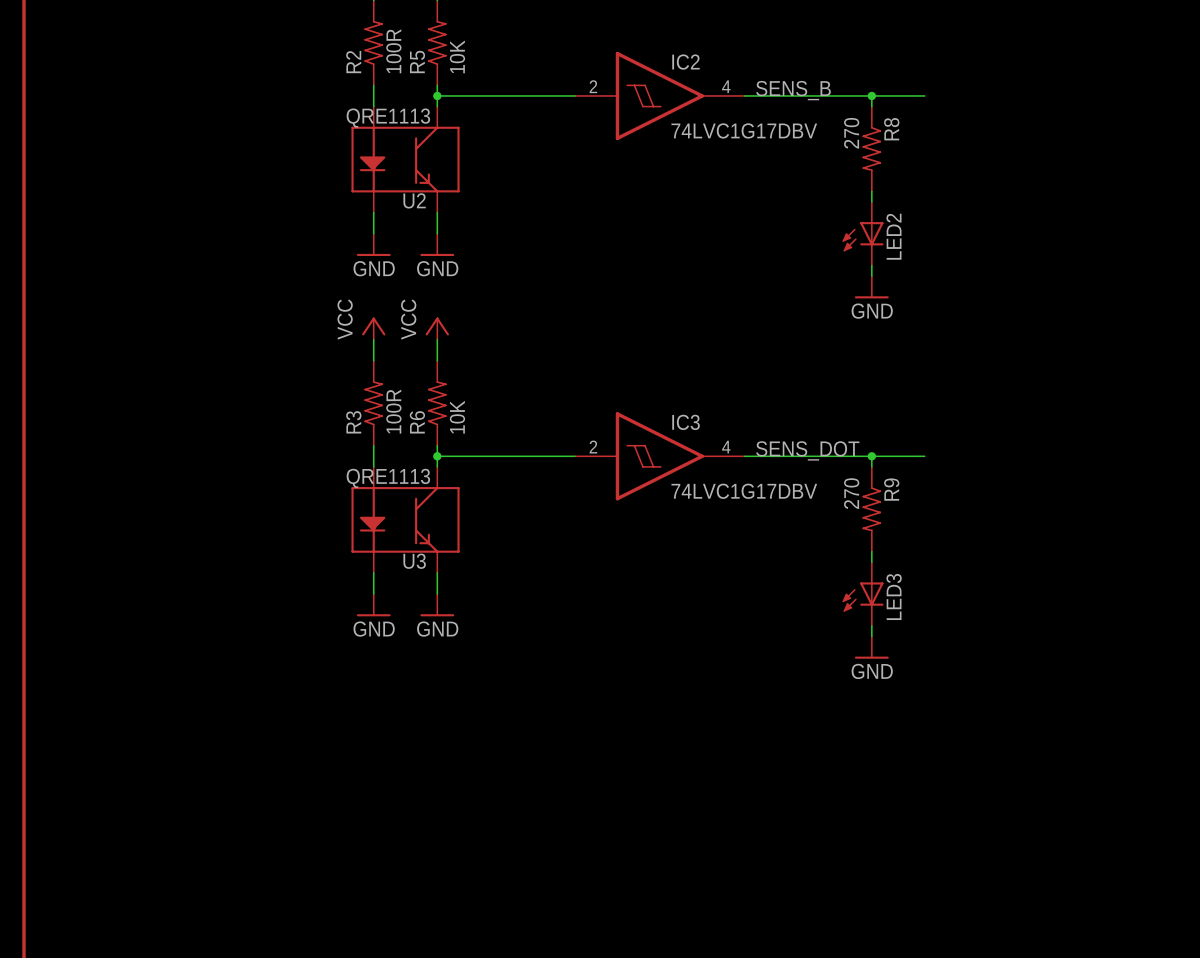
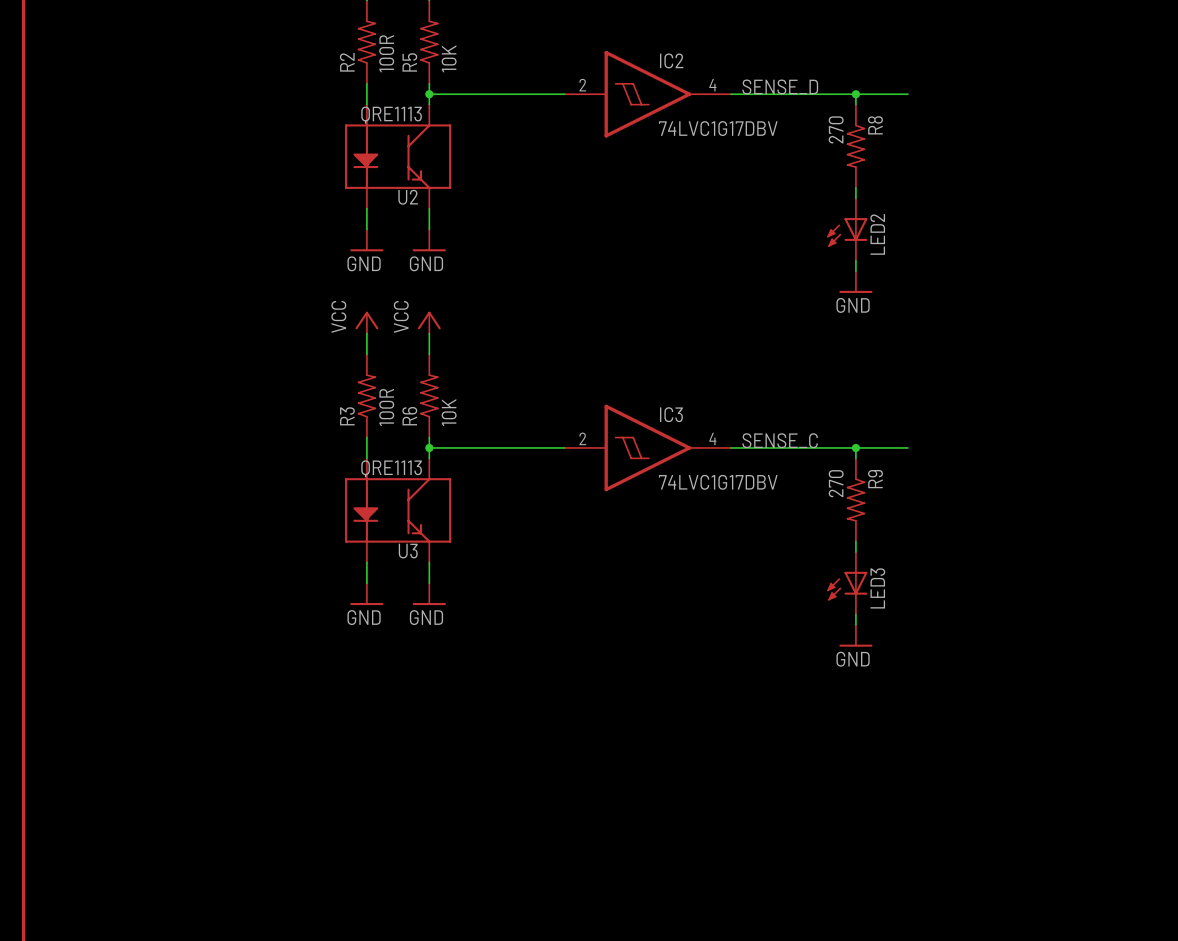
label: SENS_B (793, 90) -> SENSE_D (780, 86)
label: SENS_DOT (807, 450) -> SENSE_C (780, 440)

